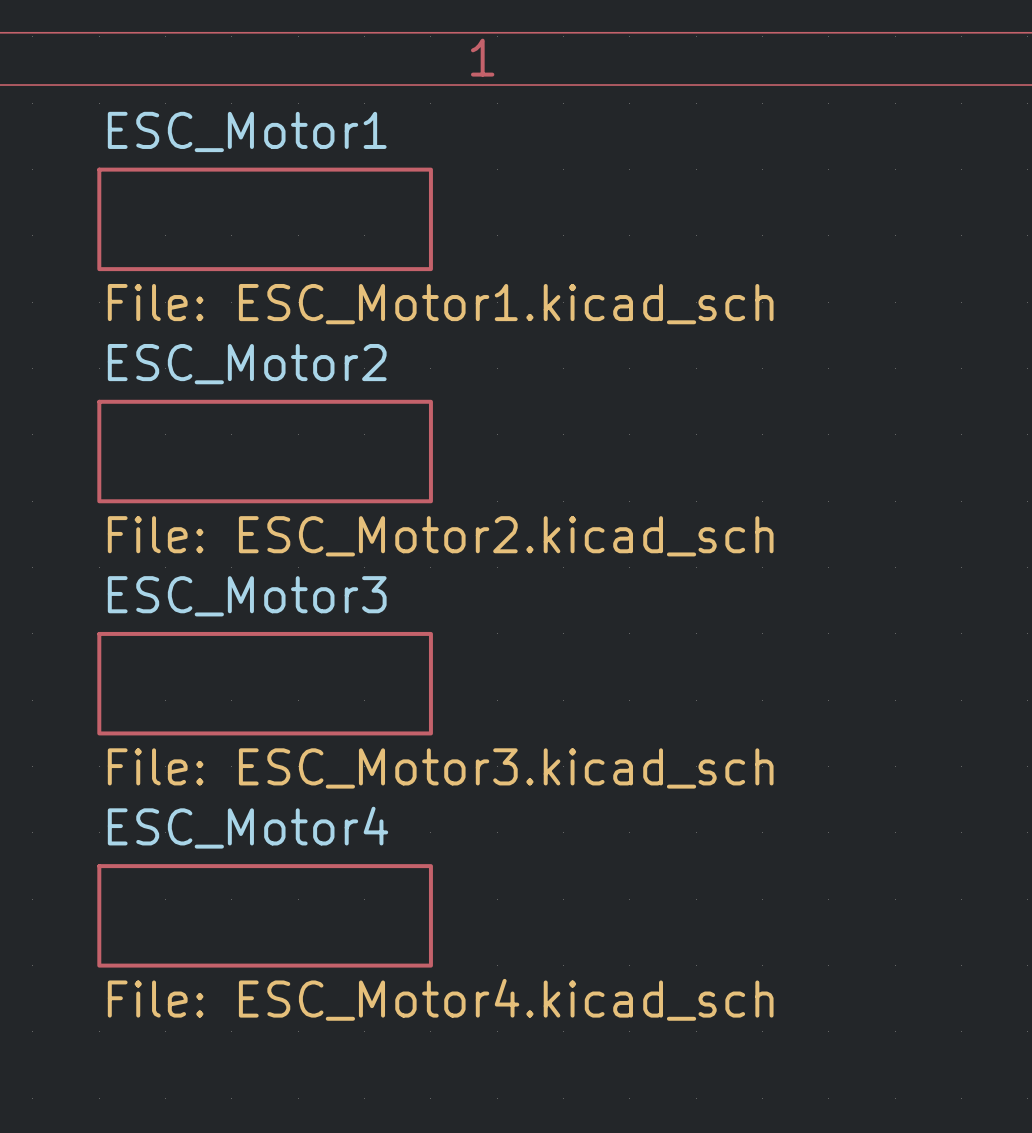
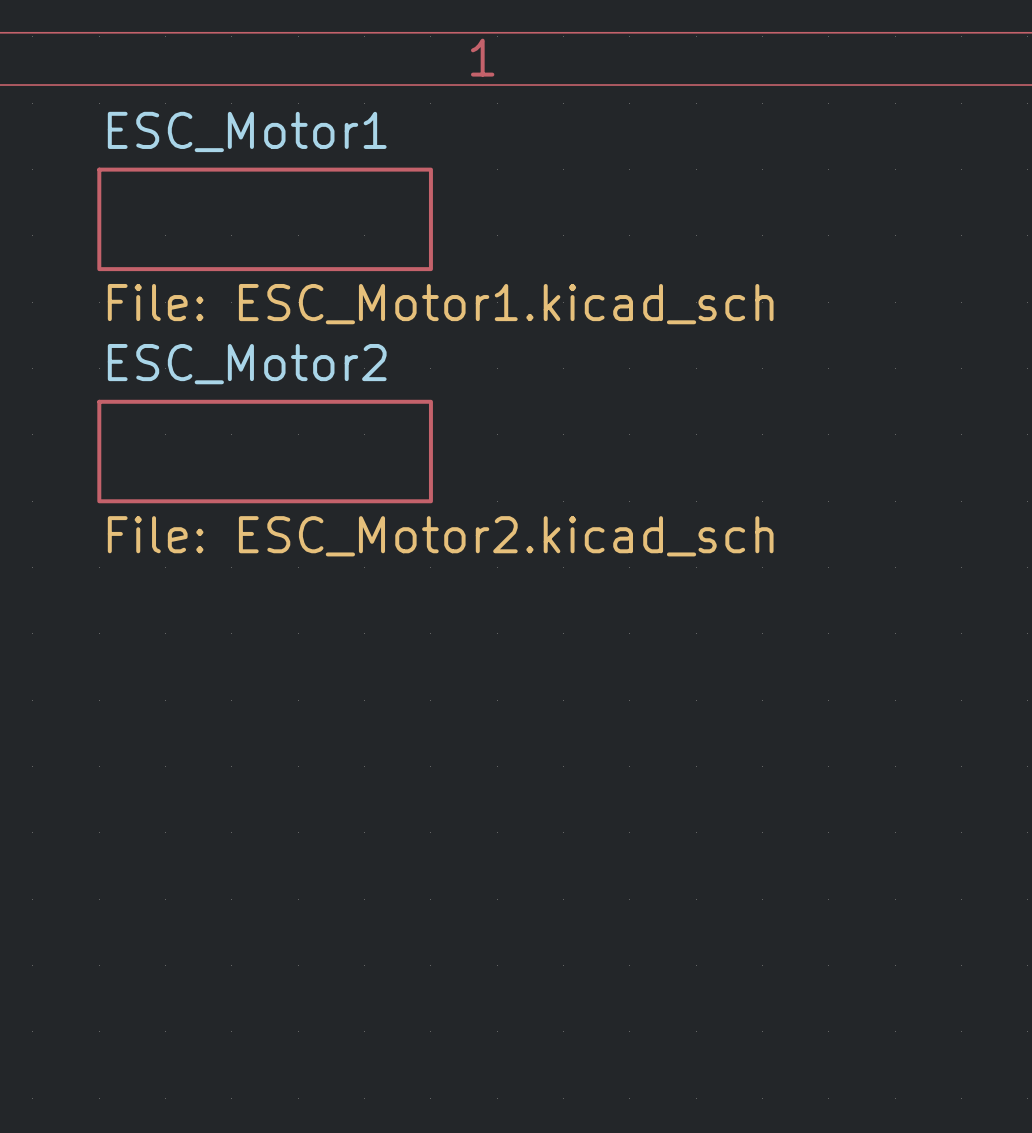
sheet ESC_Motor3: File: ESC_Motor3.kicad_sch (265, 683) -> none
sheet ESC_Motor4: File: ESC_Motor4.kicad_sch (265, 915) -> none

